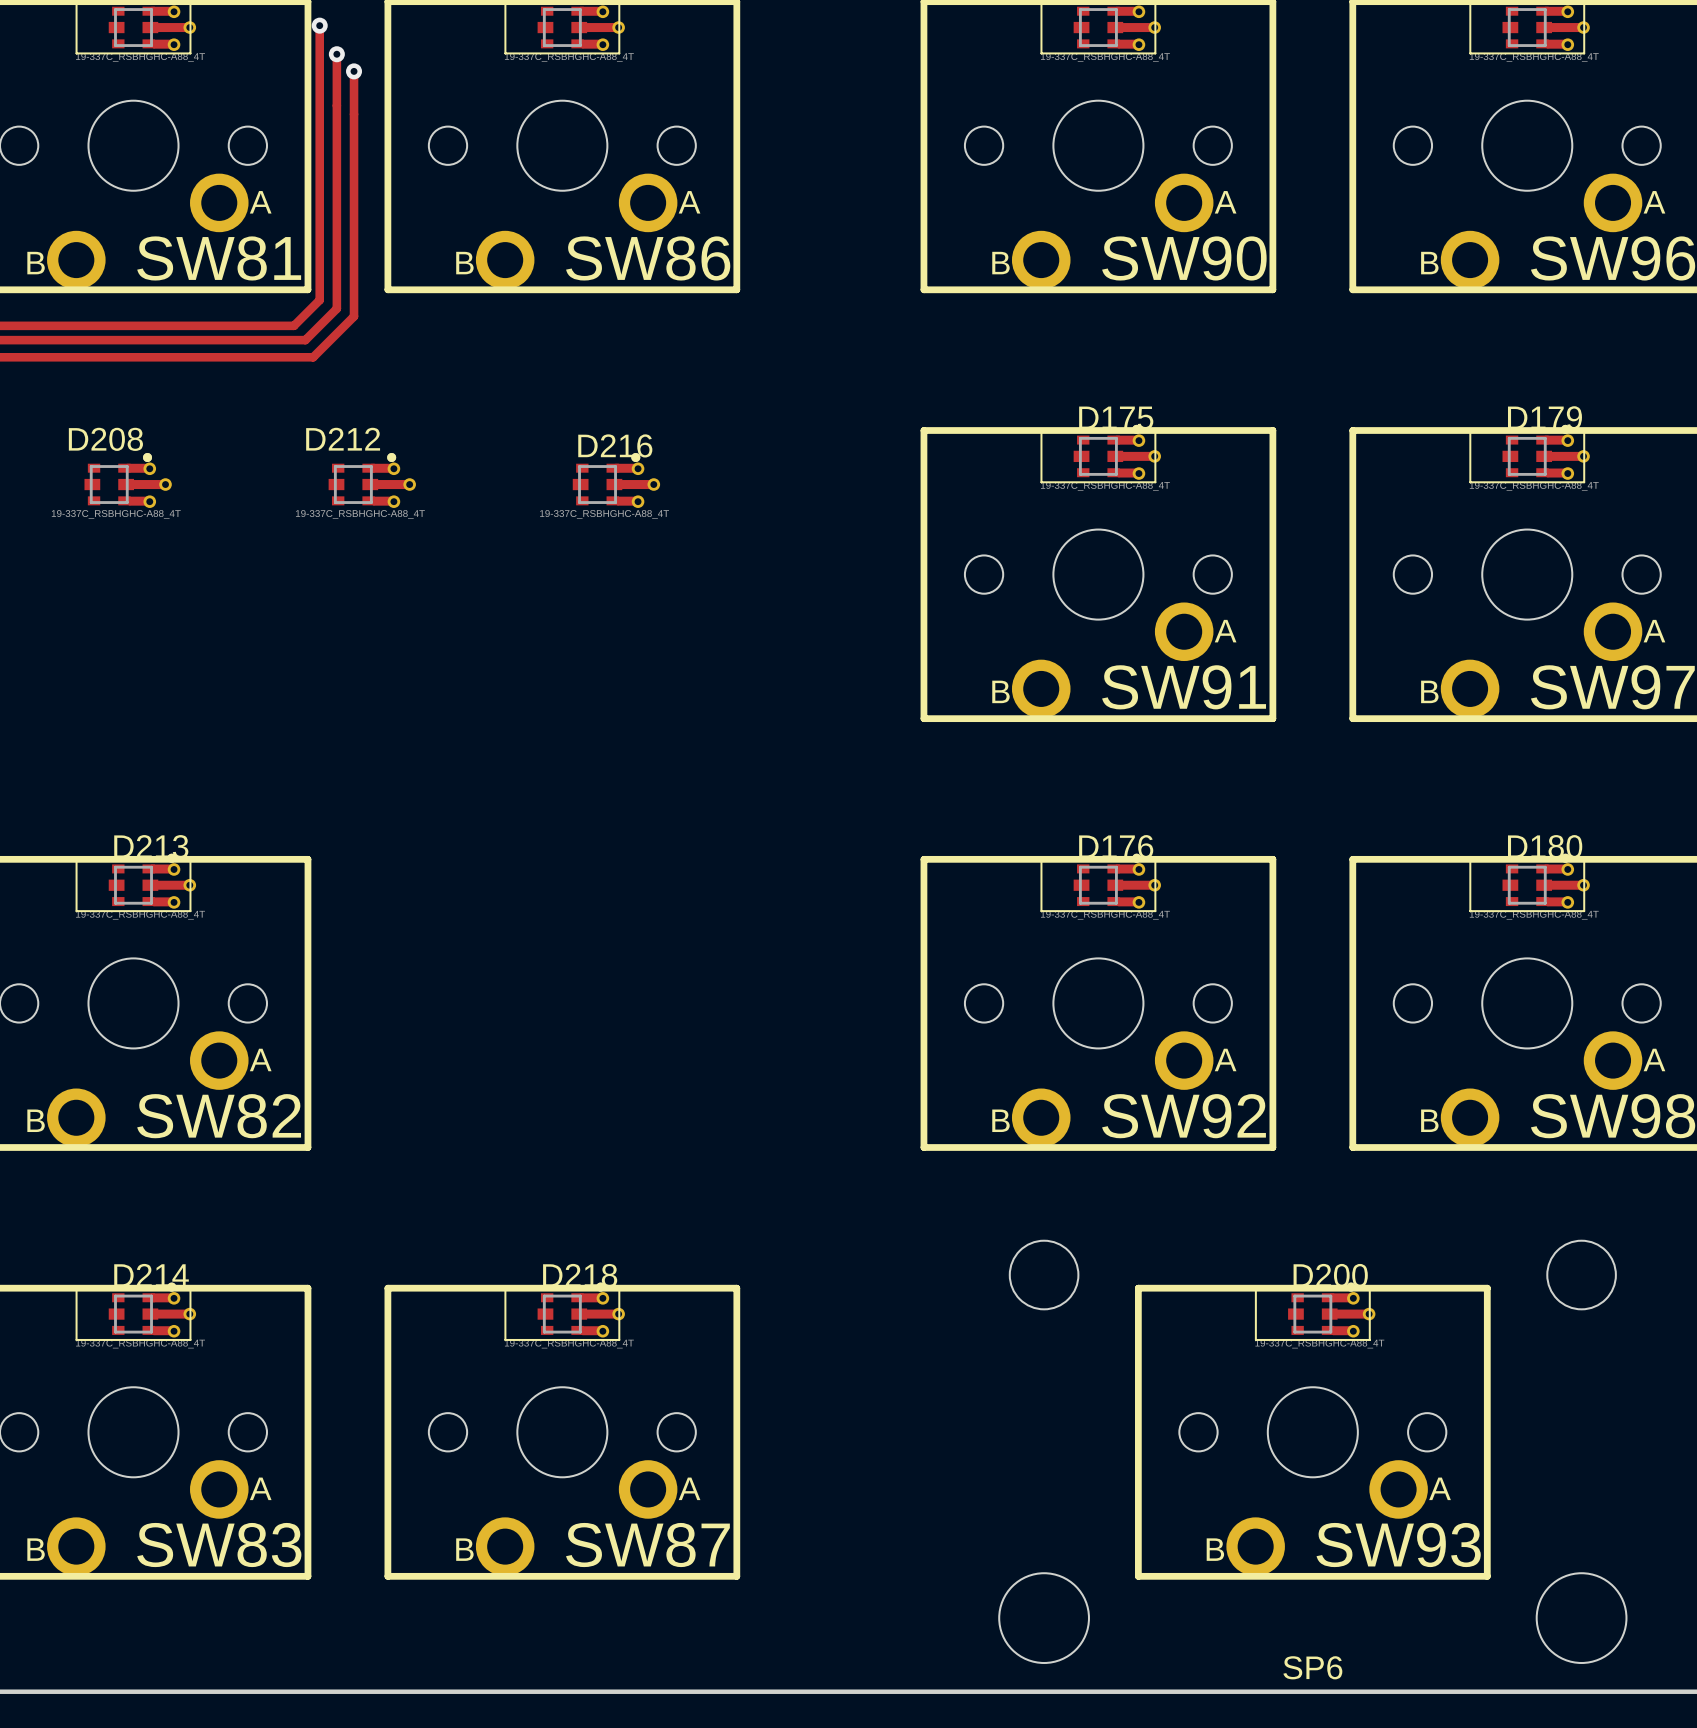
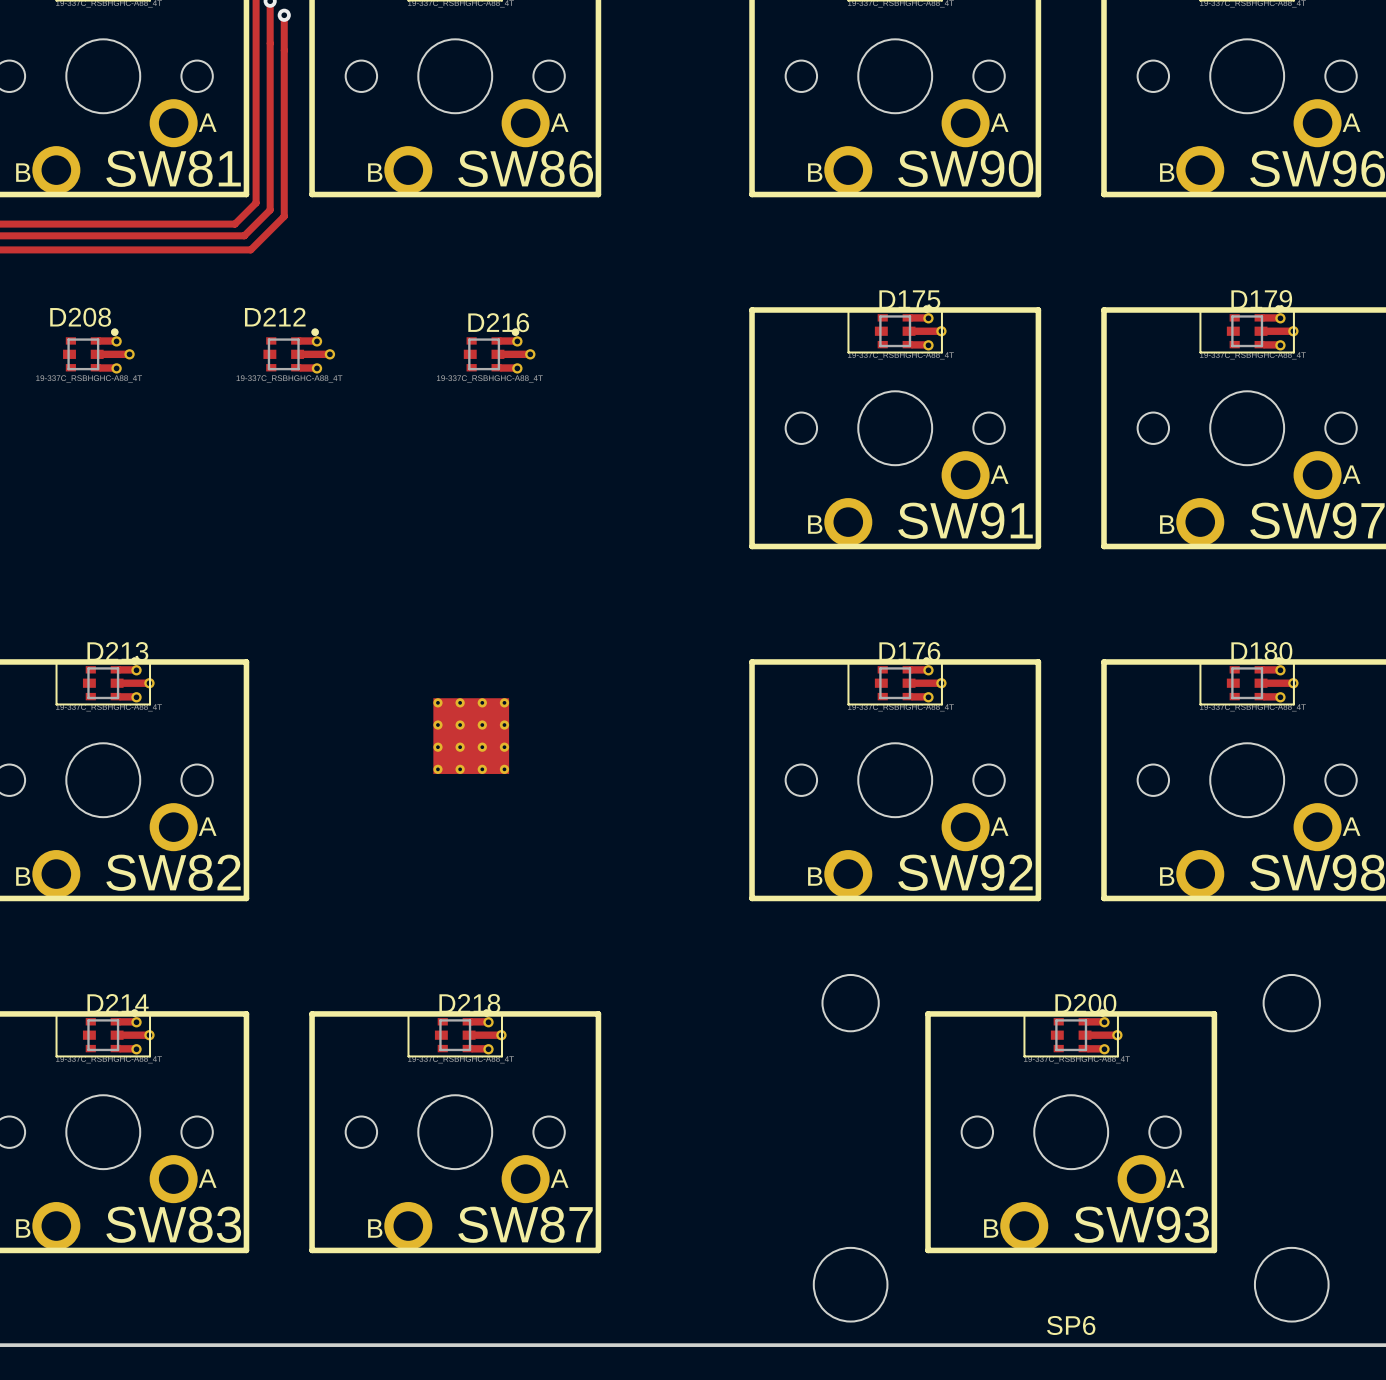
part: none -> (471, 736)

